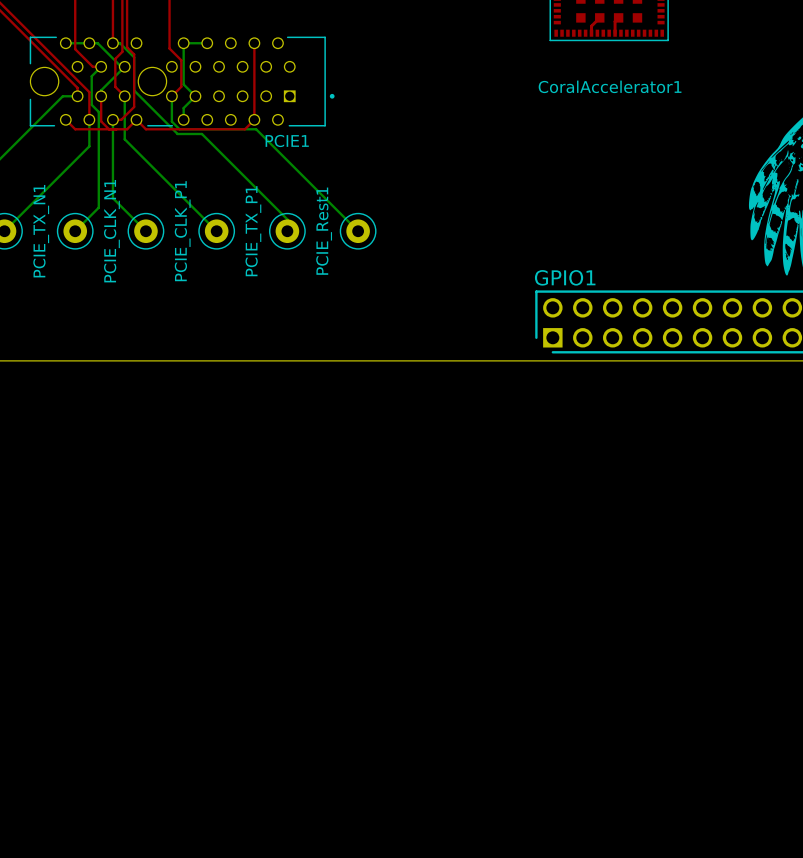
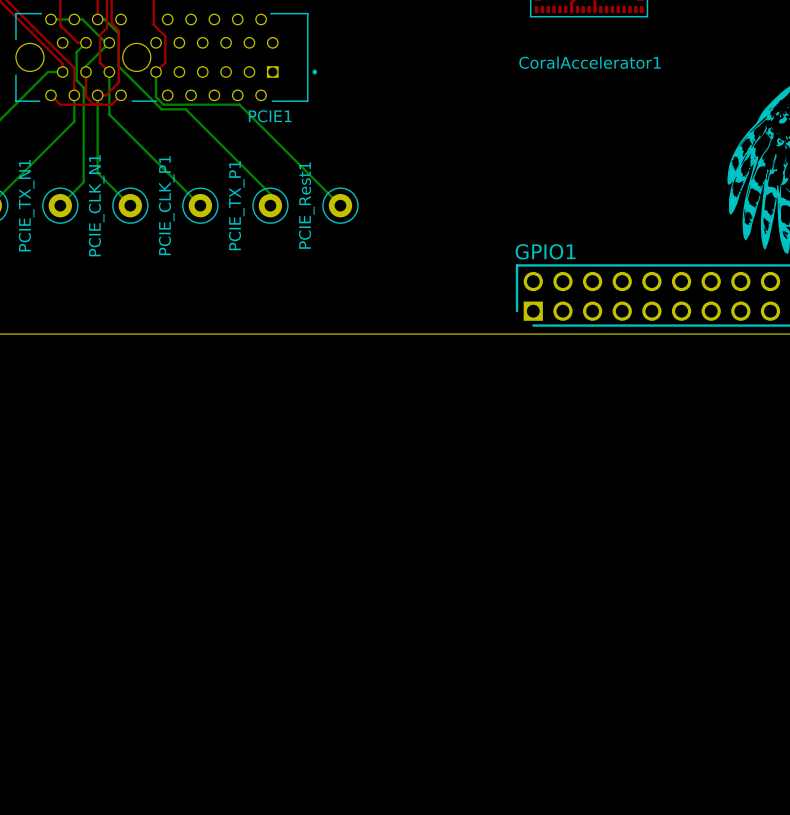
bottom track: (207, 43) (183, 43) (183, 84) (195, 96) (183, 108) (183, 119) -> none
top track: (254, 43) (254, 119) (244, 129) (145, 129) (136, 119) -> none

